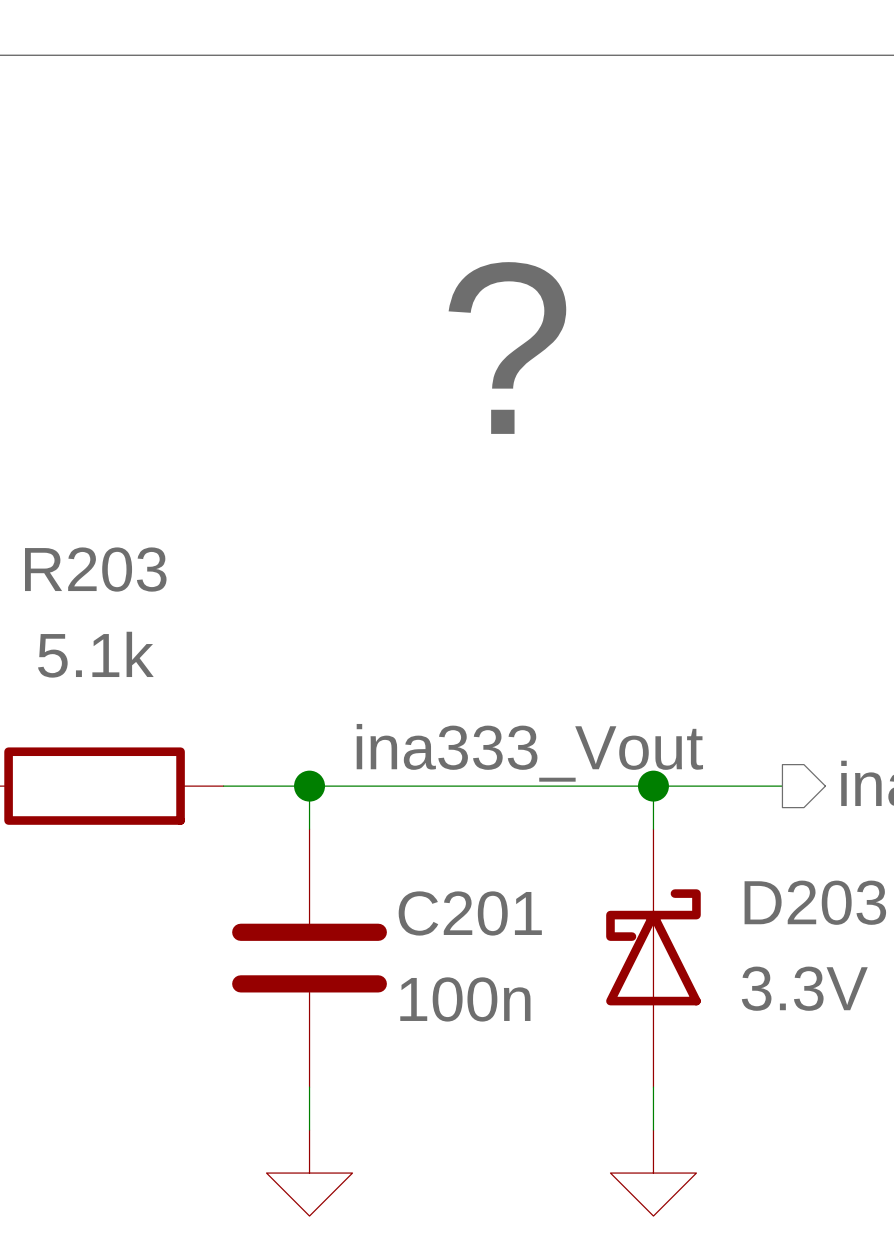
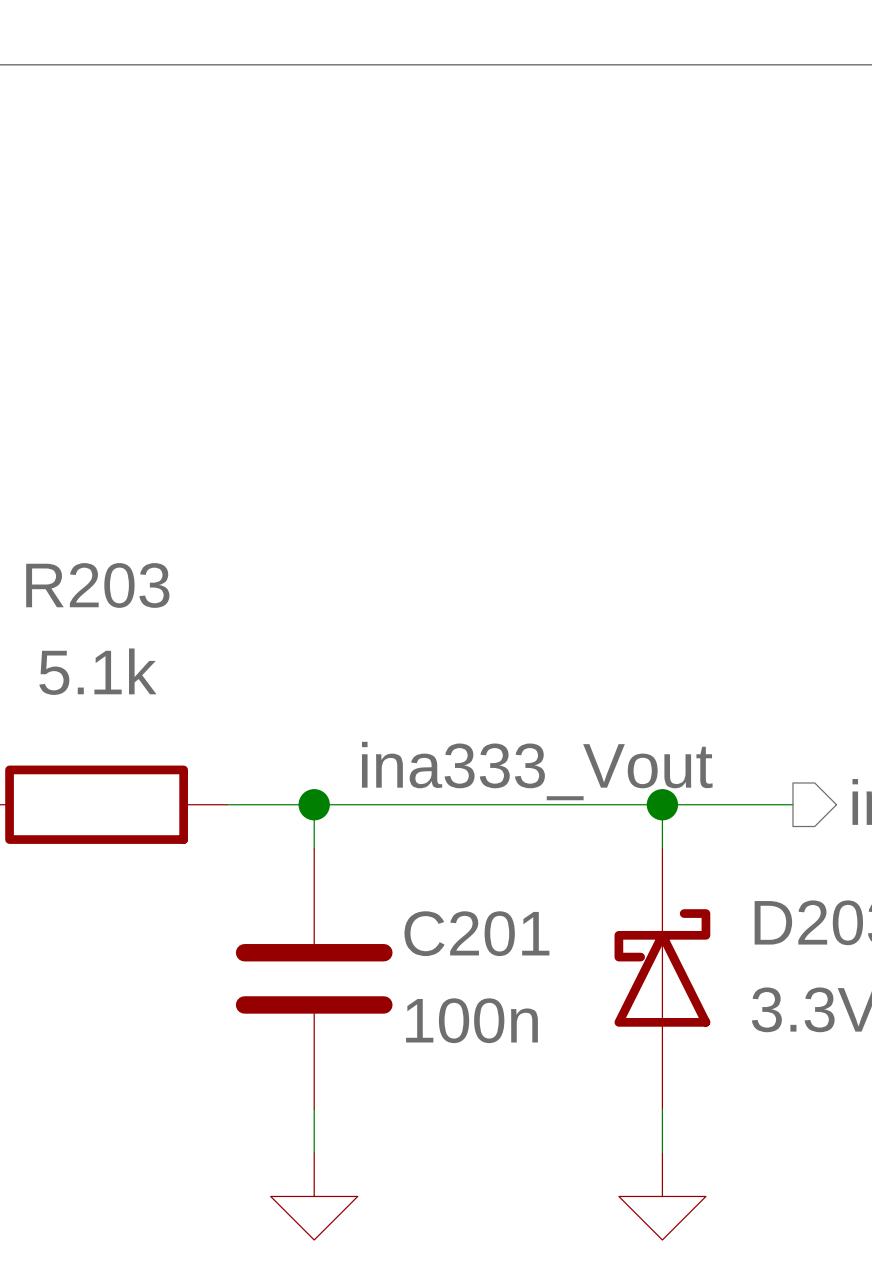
label: ? (507, 348) -> none

